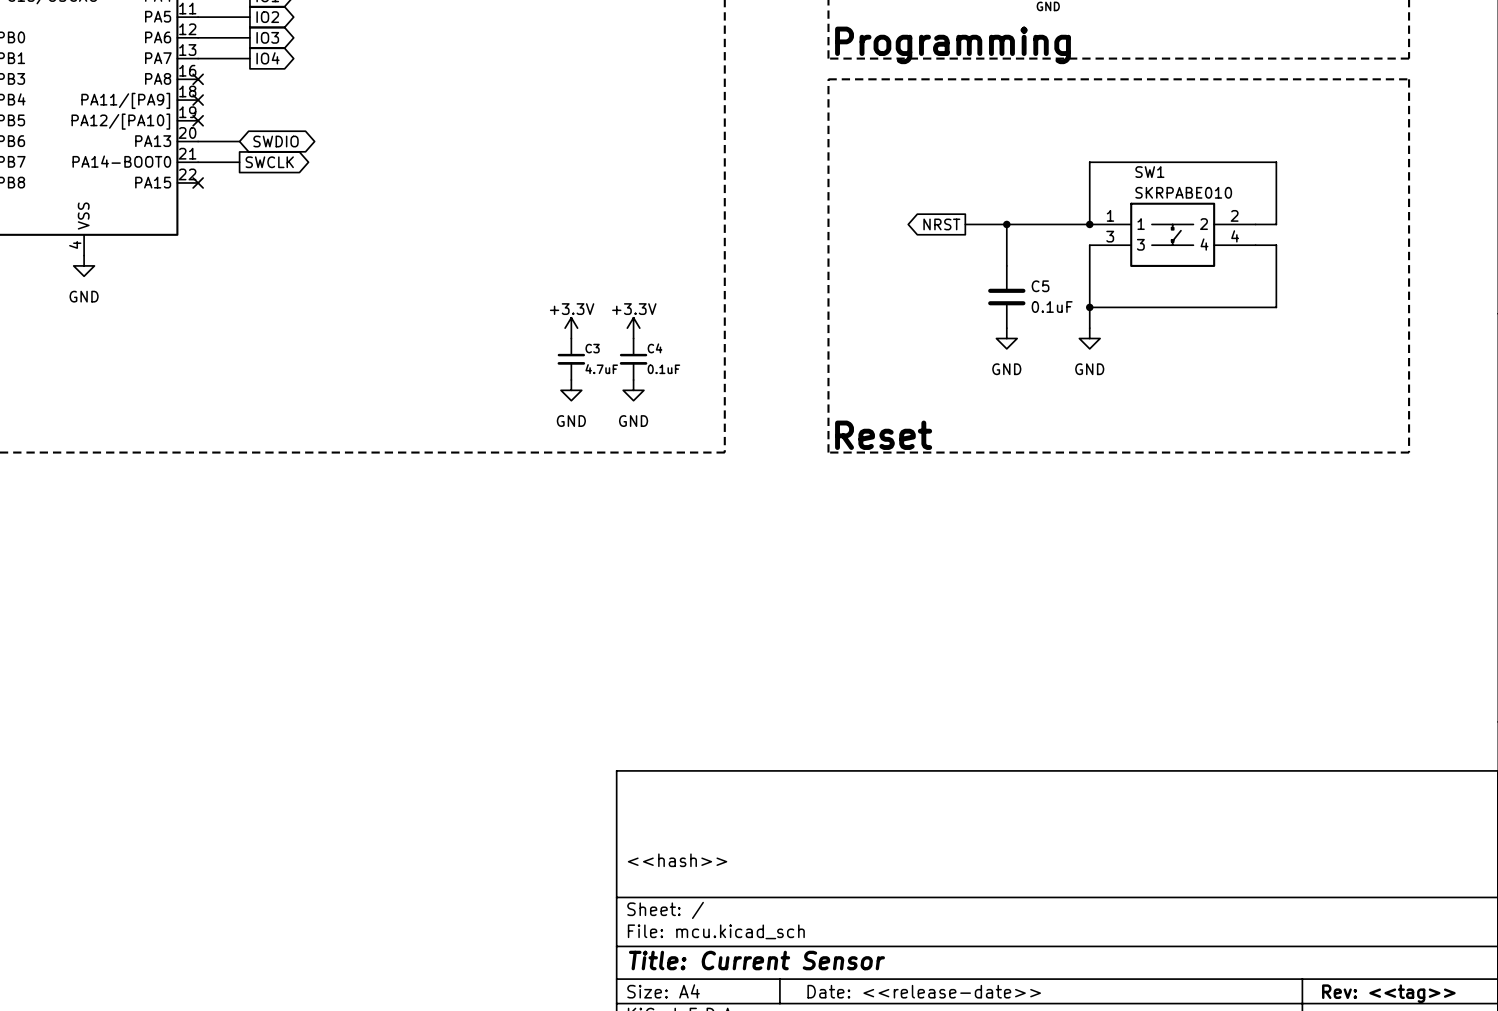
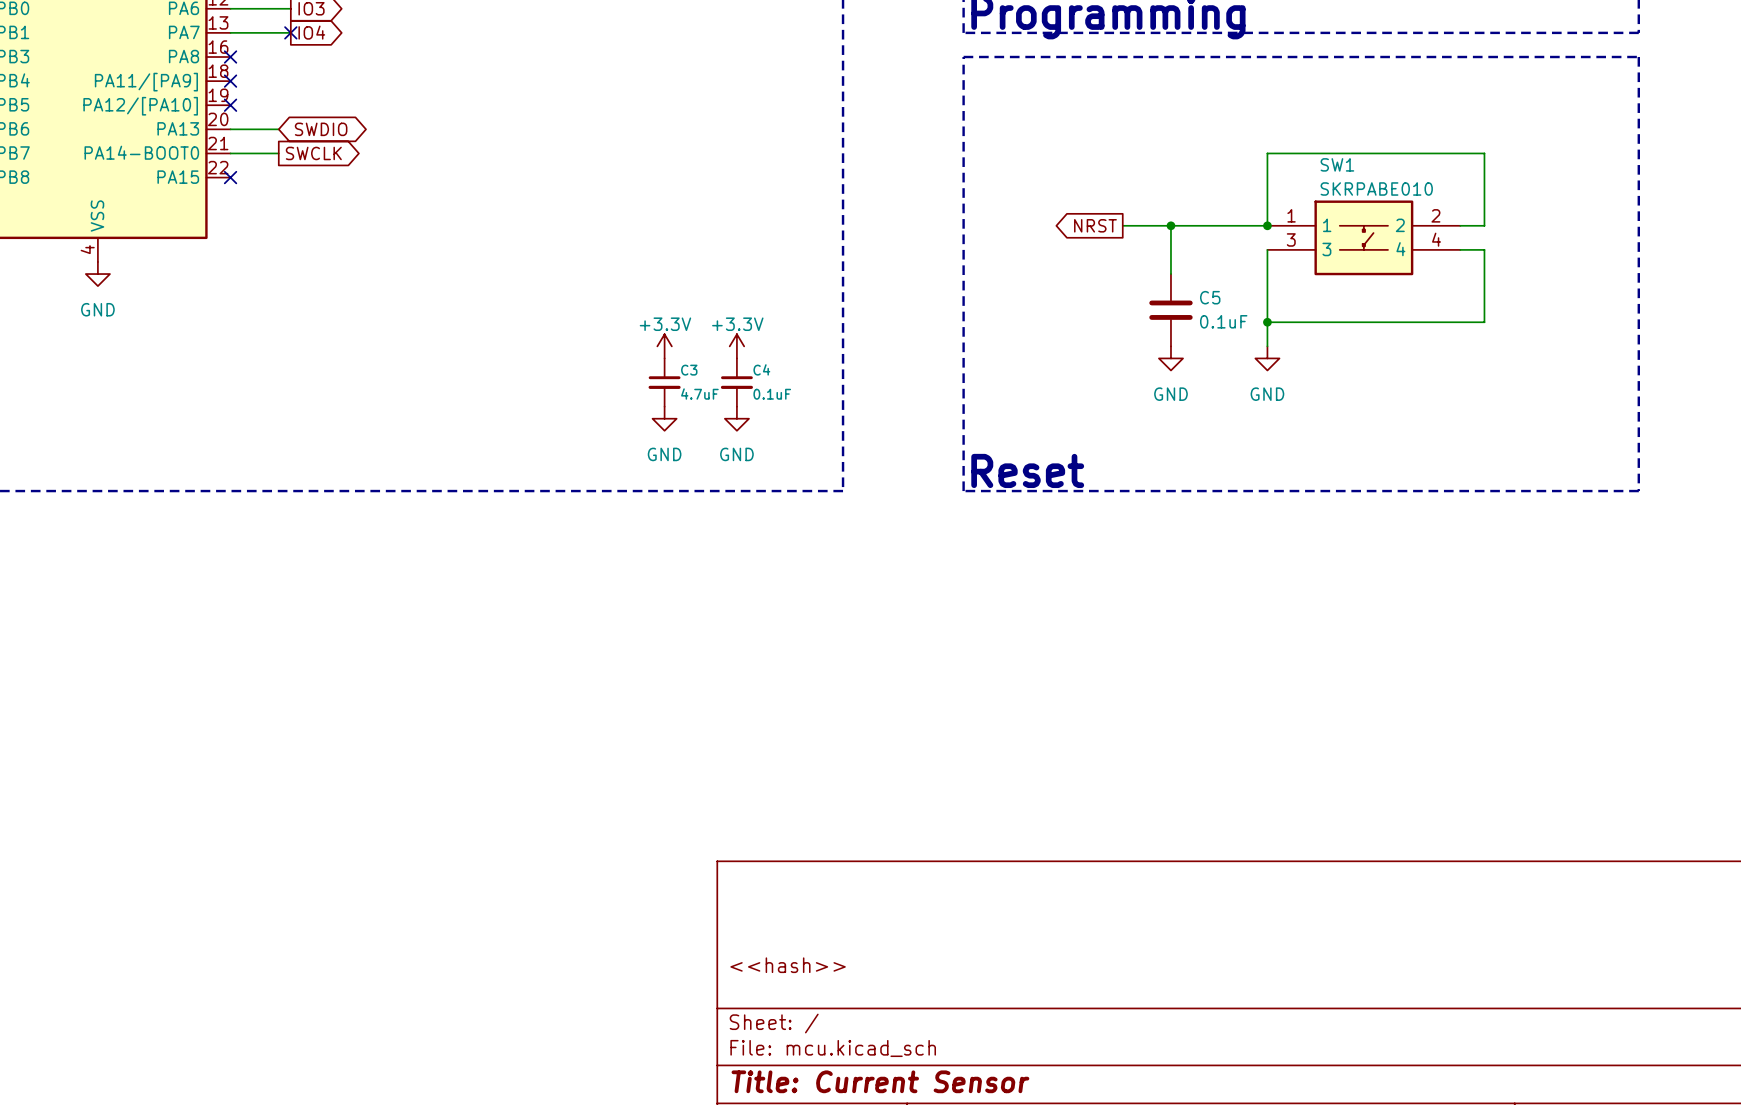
no-connect mark: none -> (290, 32)

